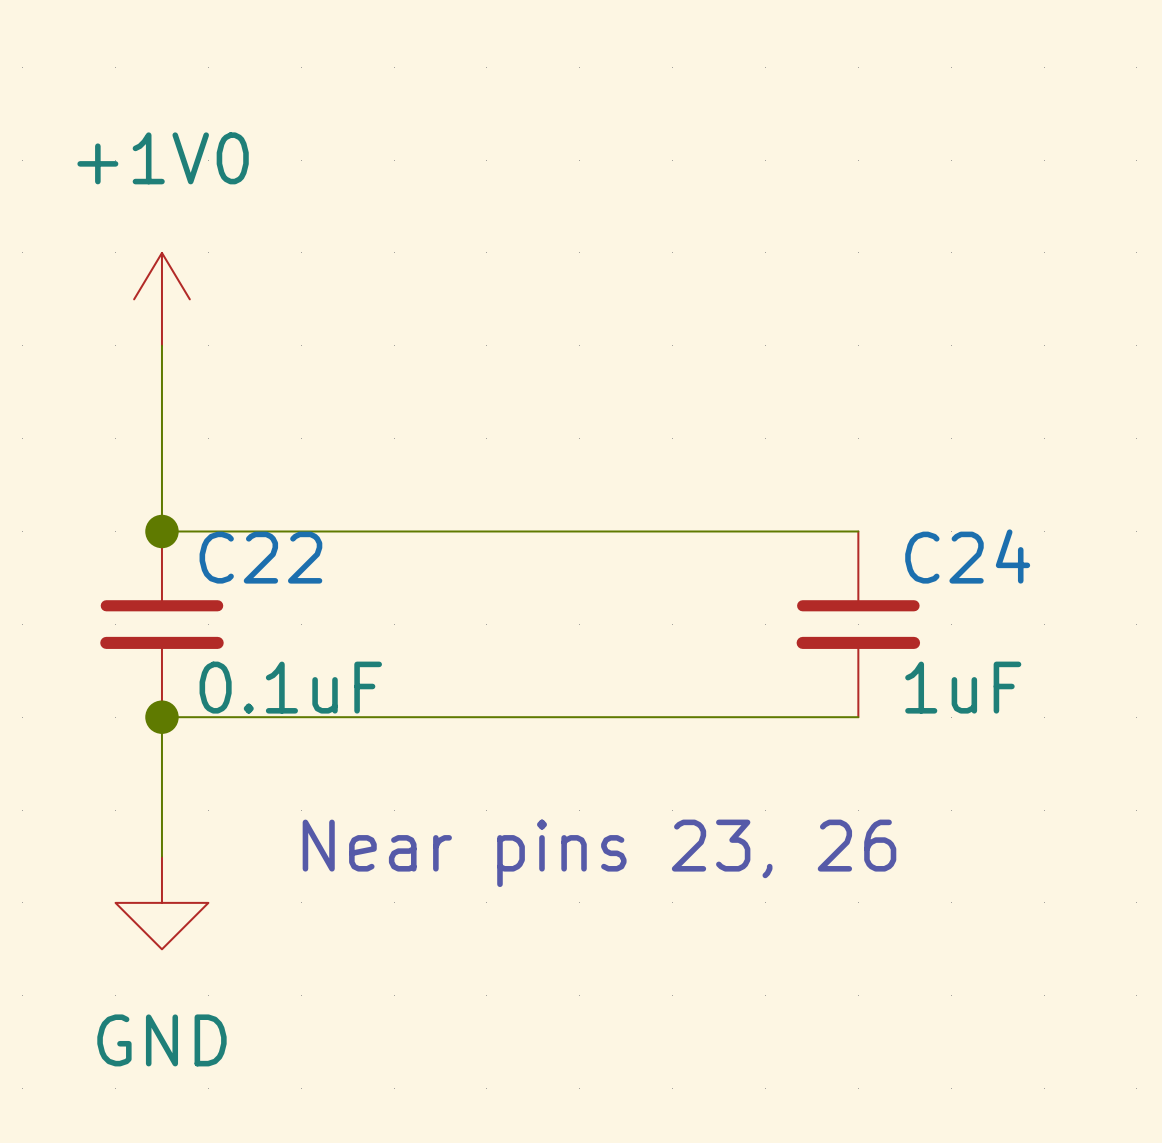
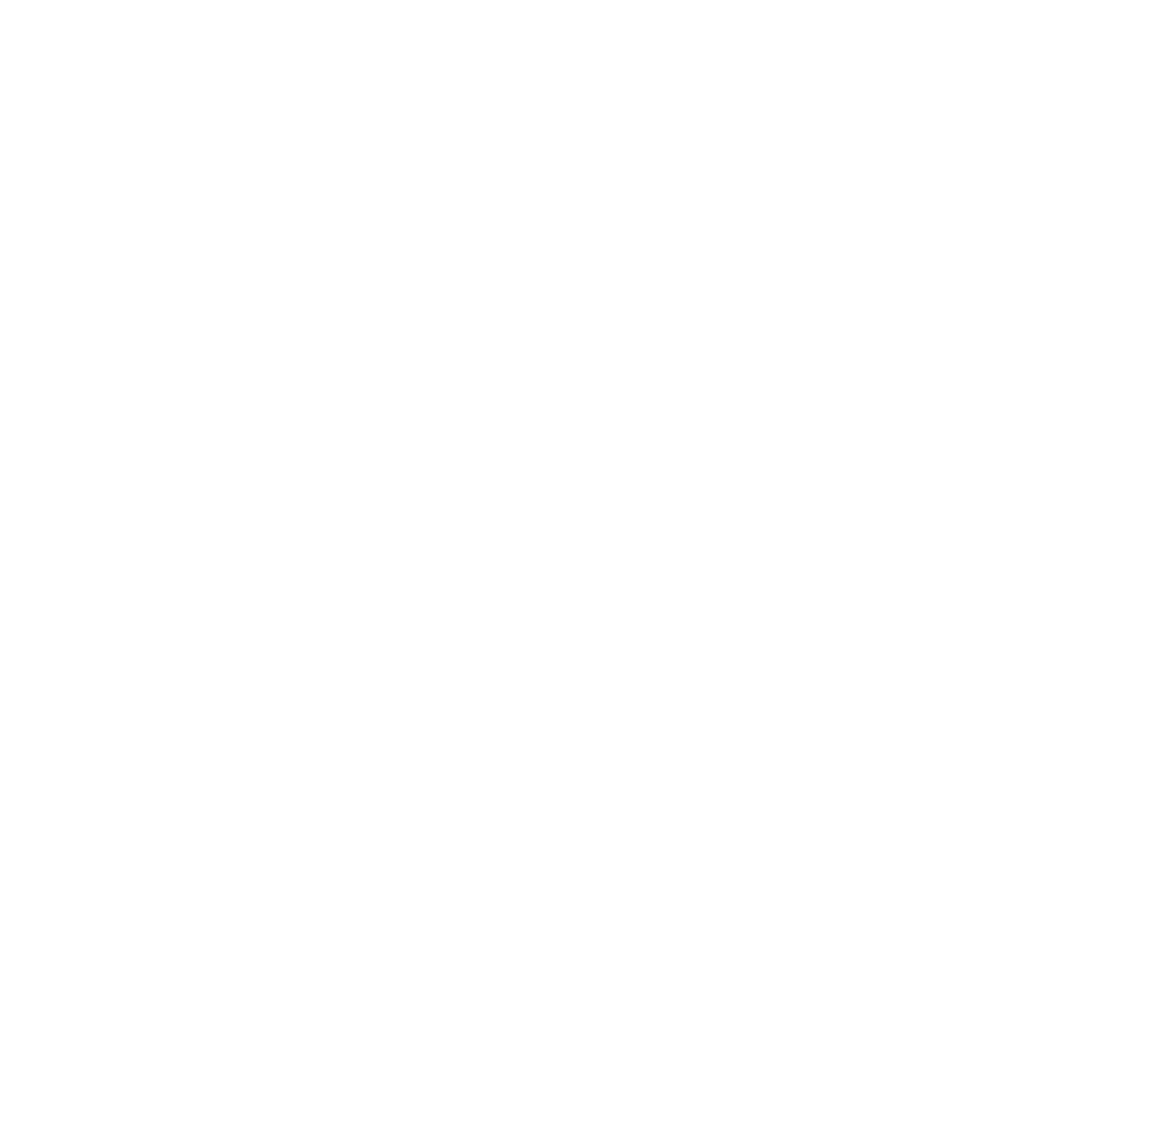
power symbol: +1V0 (161, 299) -> none
wire: (161, 345) (161, 531) (858, 531) -> none
junction: (161, 531) -> none
C22: 0.1uF (161, 624) -> none
C24: 1uF (858, 624) -> none
junction: (161, 717) -> none
wire: (858, 717) (161, 717) (161, 856) -> none
text: Near pins 23, 26 (599, 853) -> none
power symbol: GND (161, 902) -> none

